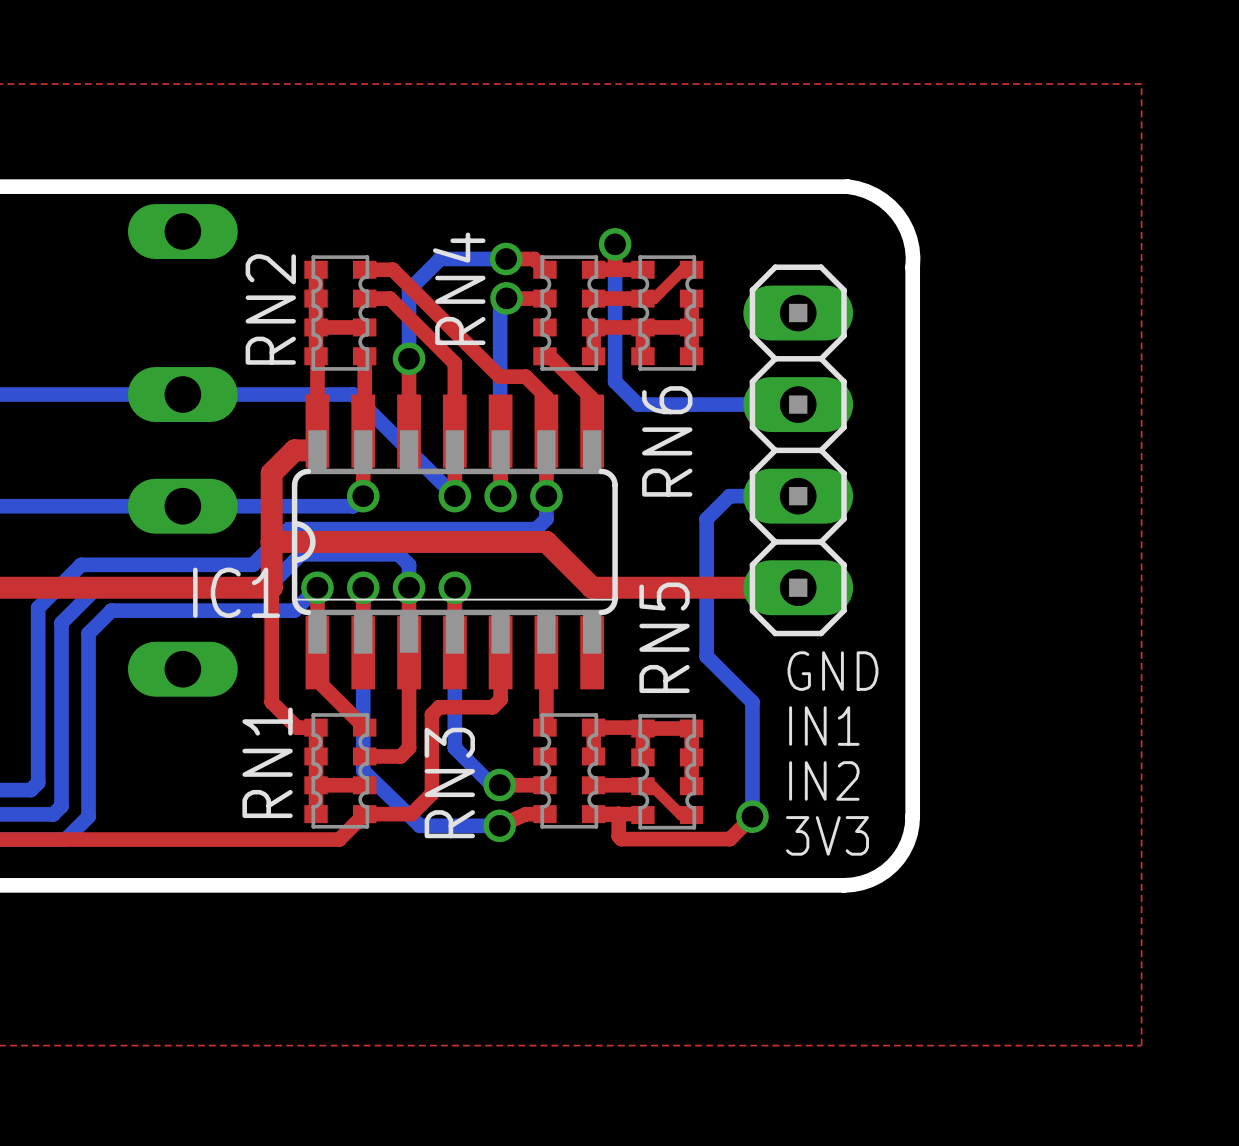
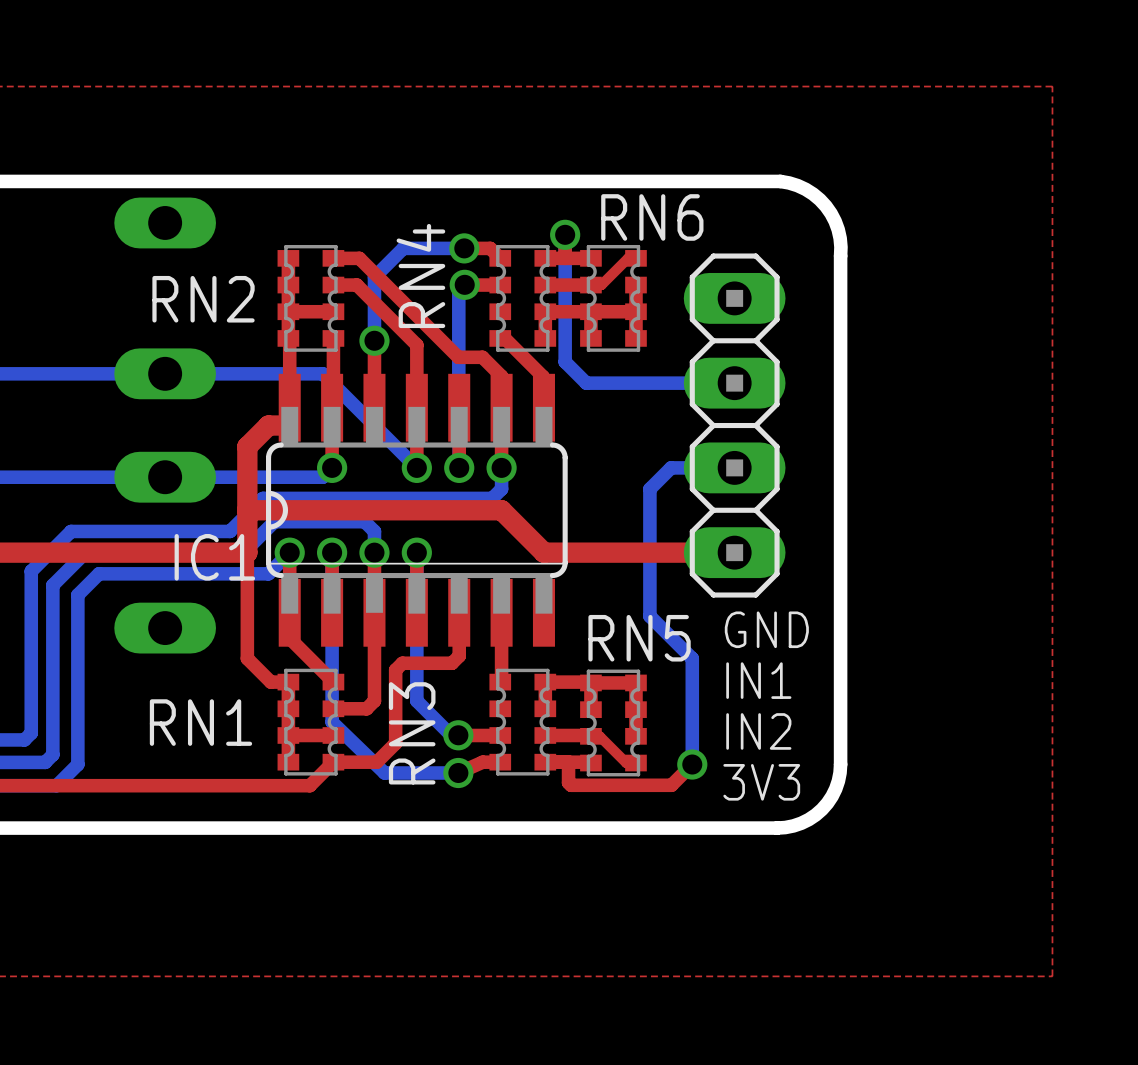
RN2 name rotation: 0° (270, 309) -> 90° clockwise (203, 299)
RN6 name rotation: 0° (667, 441) -> 90° clockwise (652, 217)
RN6 name position: RN6 (667, 441) -> RN6 (652, 217)
RN5 name rotation: 0° (664, 637) -> 90° clockwise (639, 638)
RN1 name rotation: 0° (267, 762) -> 90° clockwise (200, 722)

